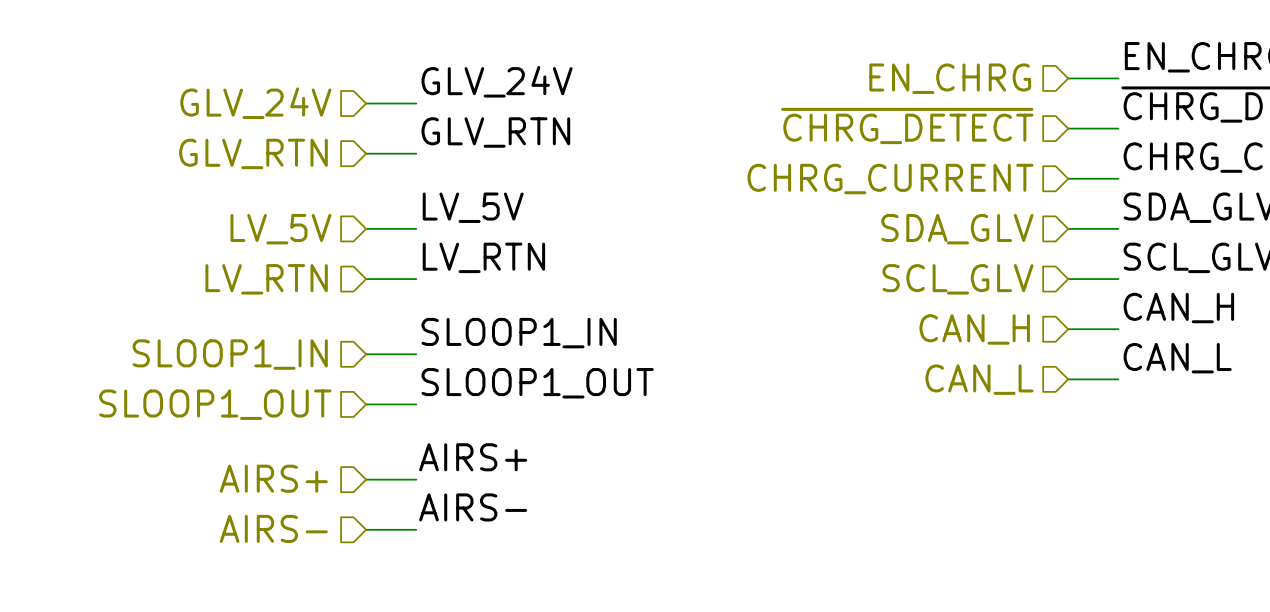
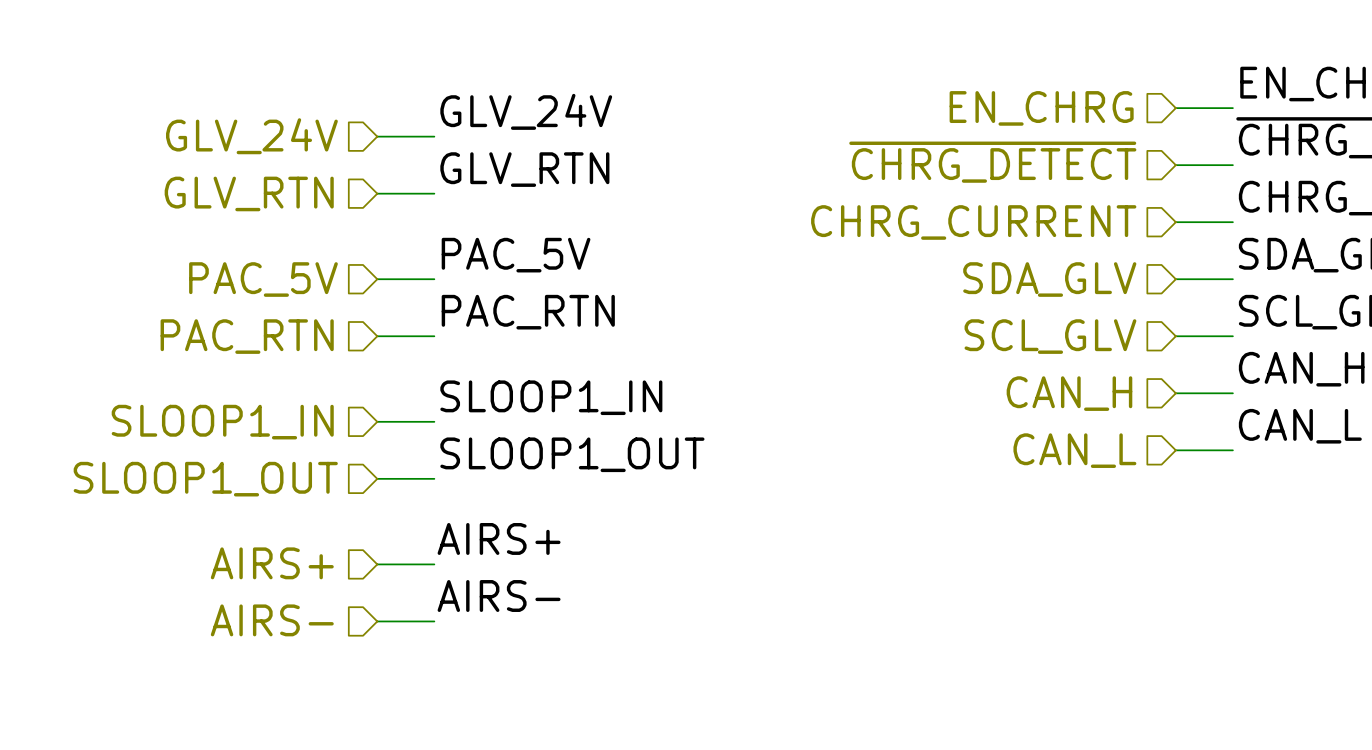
label: LV_5V (473, 207) -> PAC_5V (516, 255)
hierarchical label: LV_5V (280, 229) -> PAC_5V (263, 279)
label: LV_RTN (483, 257) -> PAC_RTN (528, 312)
hierarchical label: LV_RTN (266, 279) -> PAC_RTN (247, 336)

